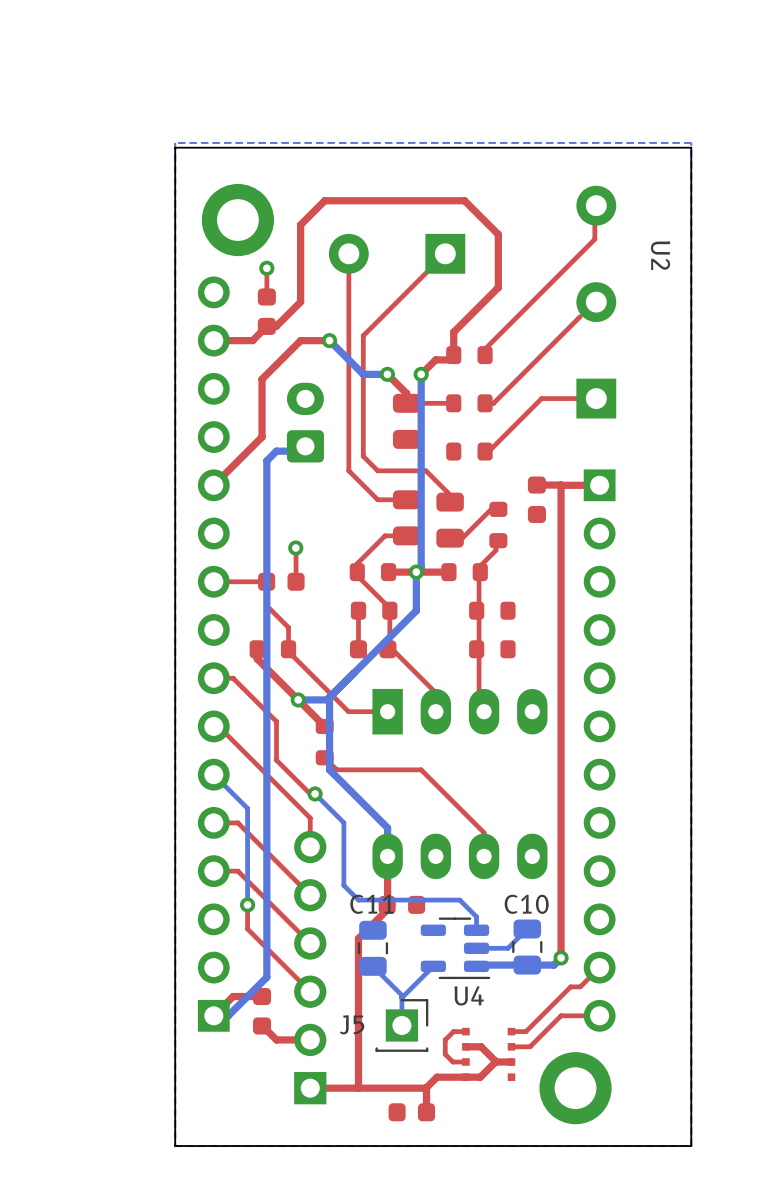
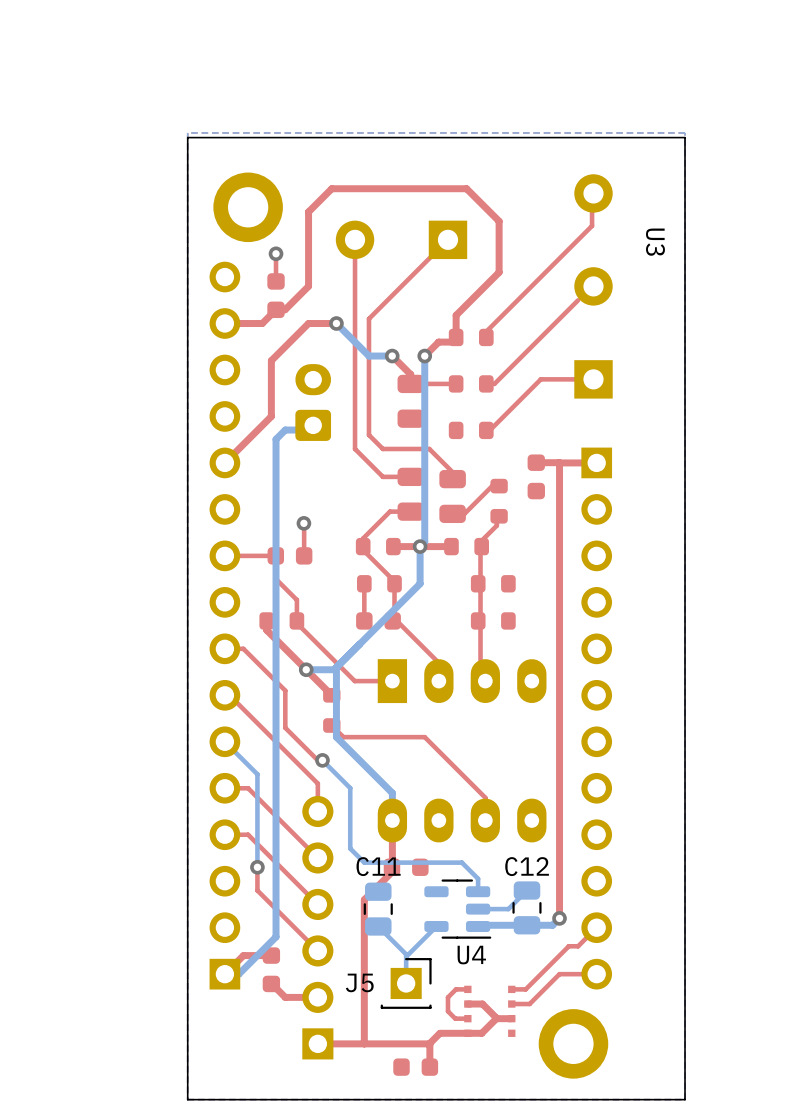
U2 name: U2 (660, 255) -> U3 (655, 242)
C10 name: C10 (526, 904) -> C12 (527, 866)

